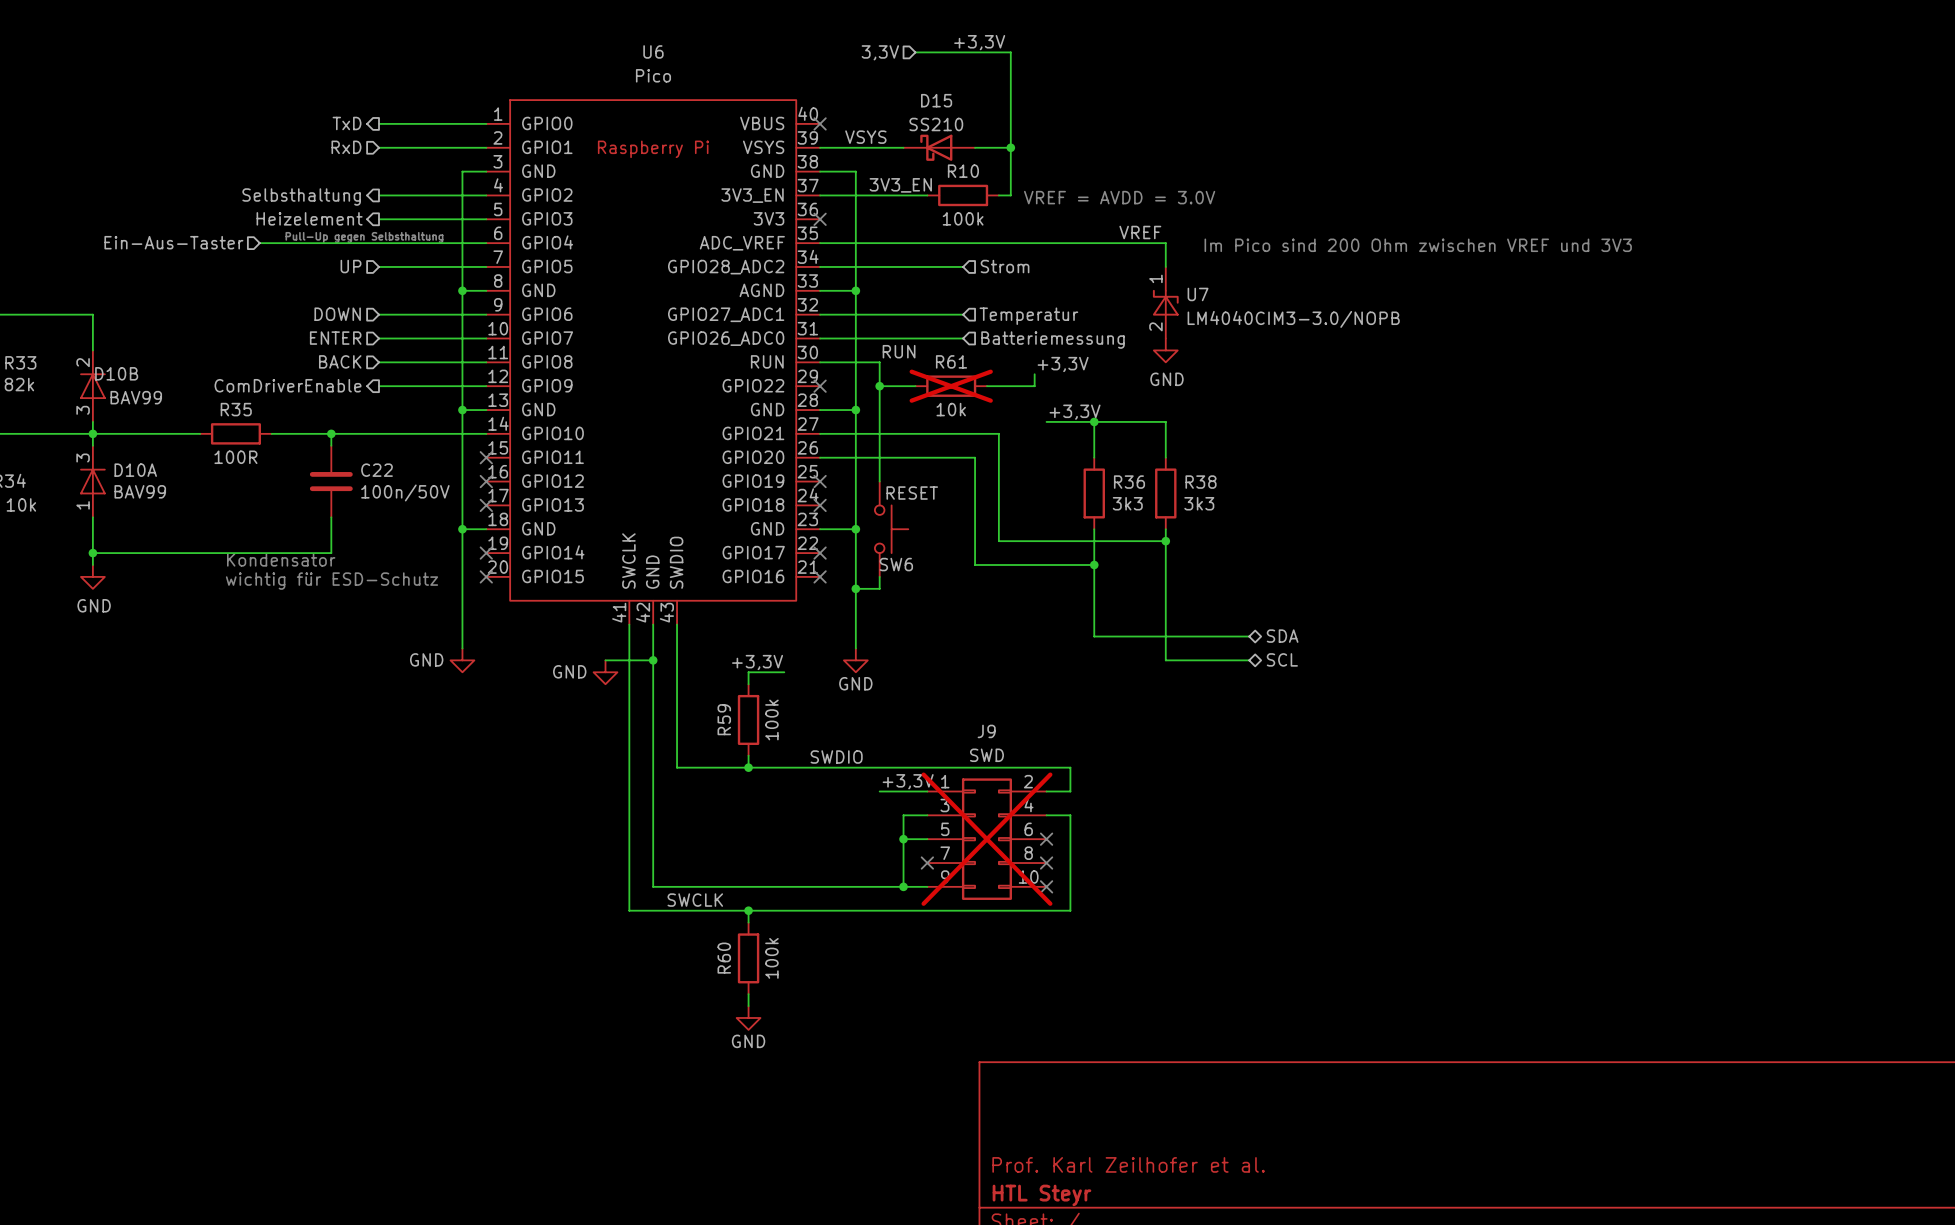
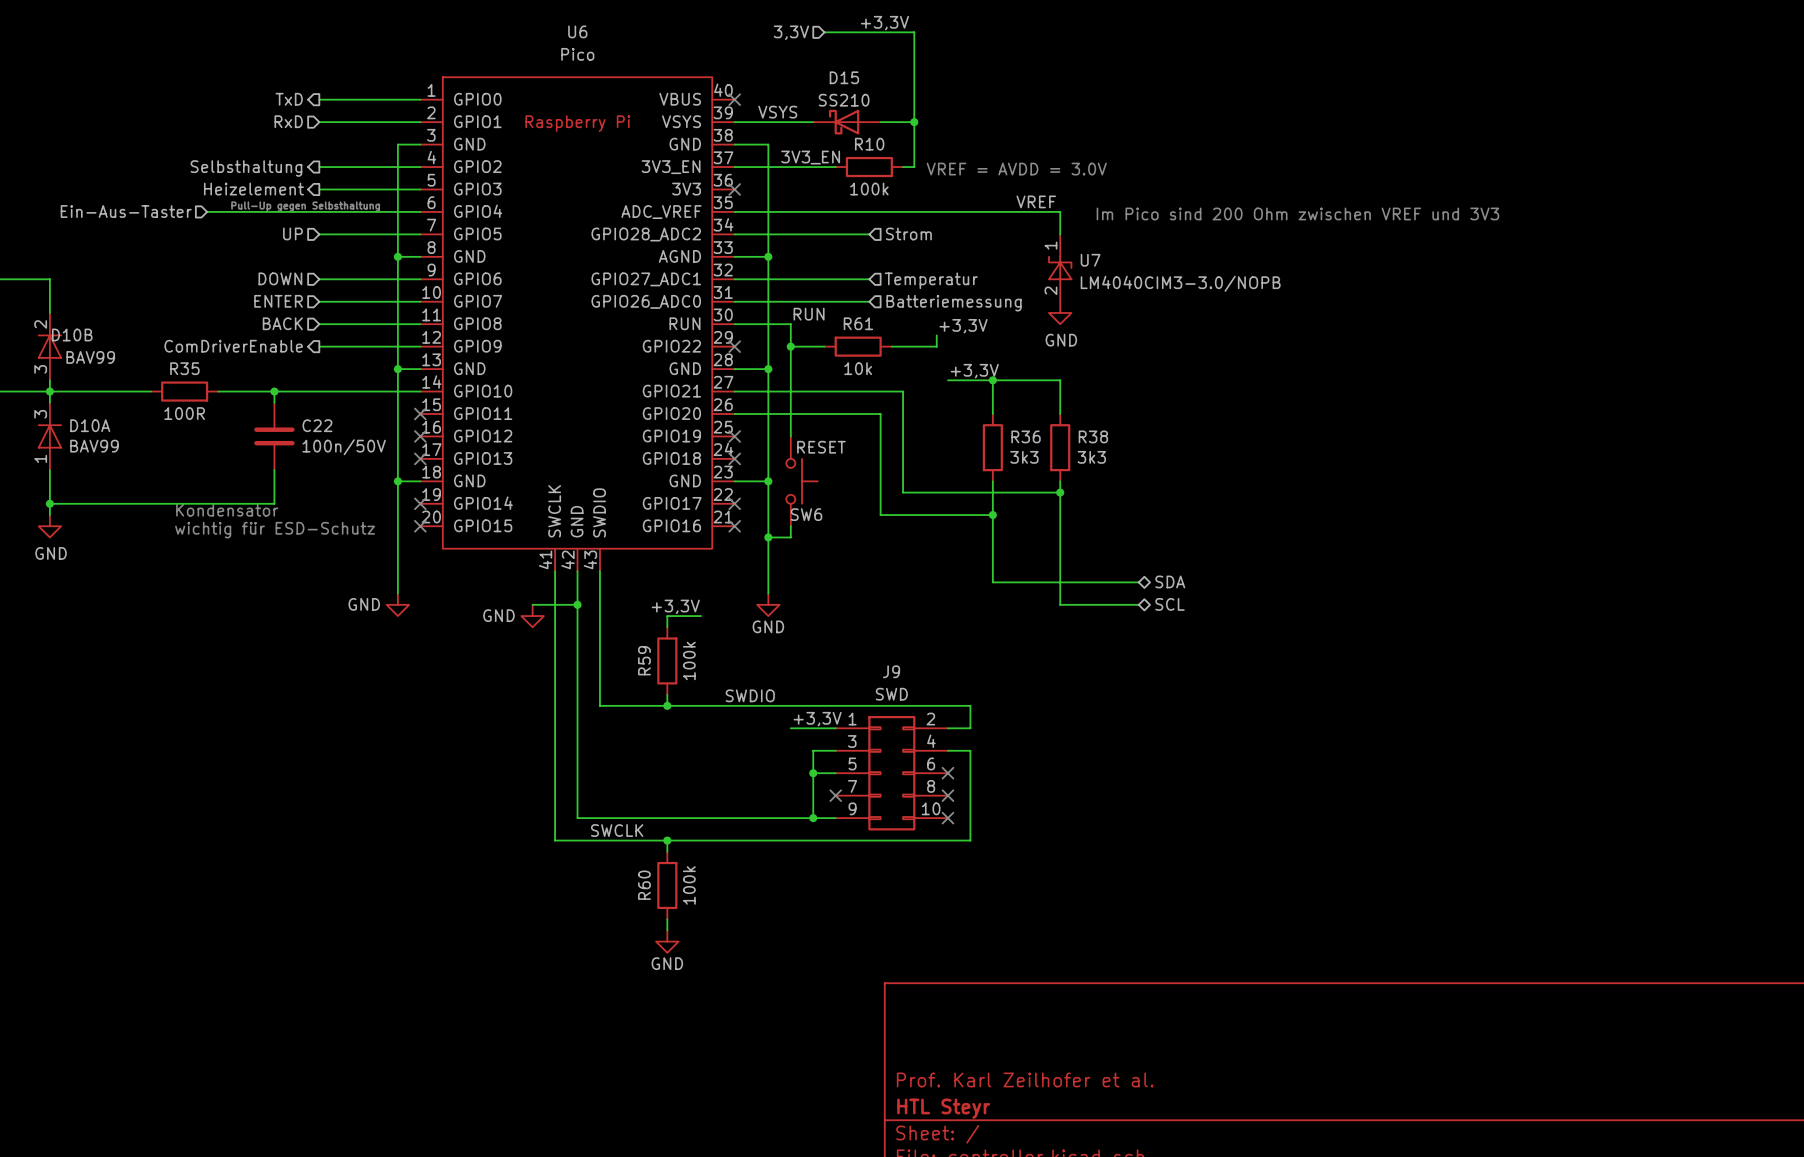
R61 do-not-place cross: (951, 386) -> none
J9 do-not-place cross: (986, 839) -> none

